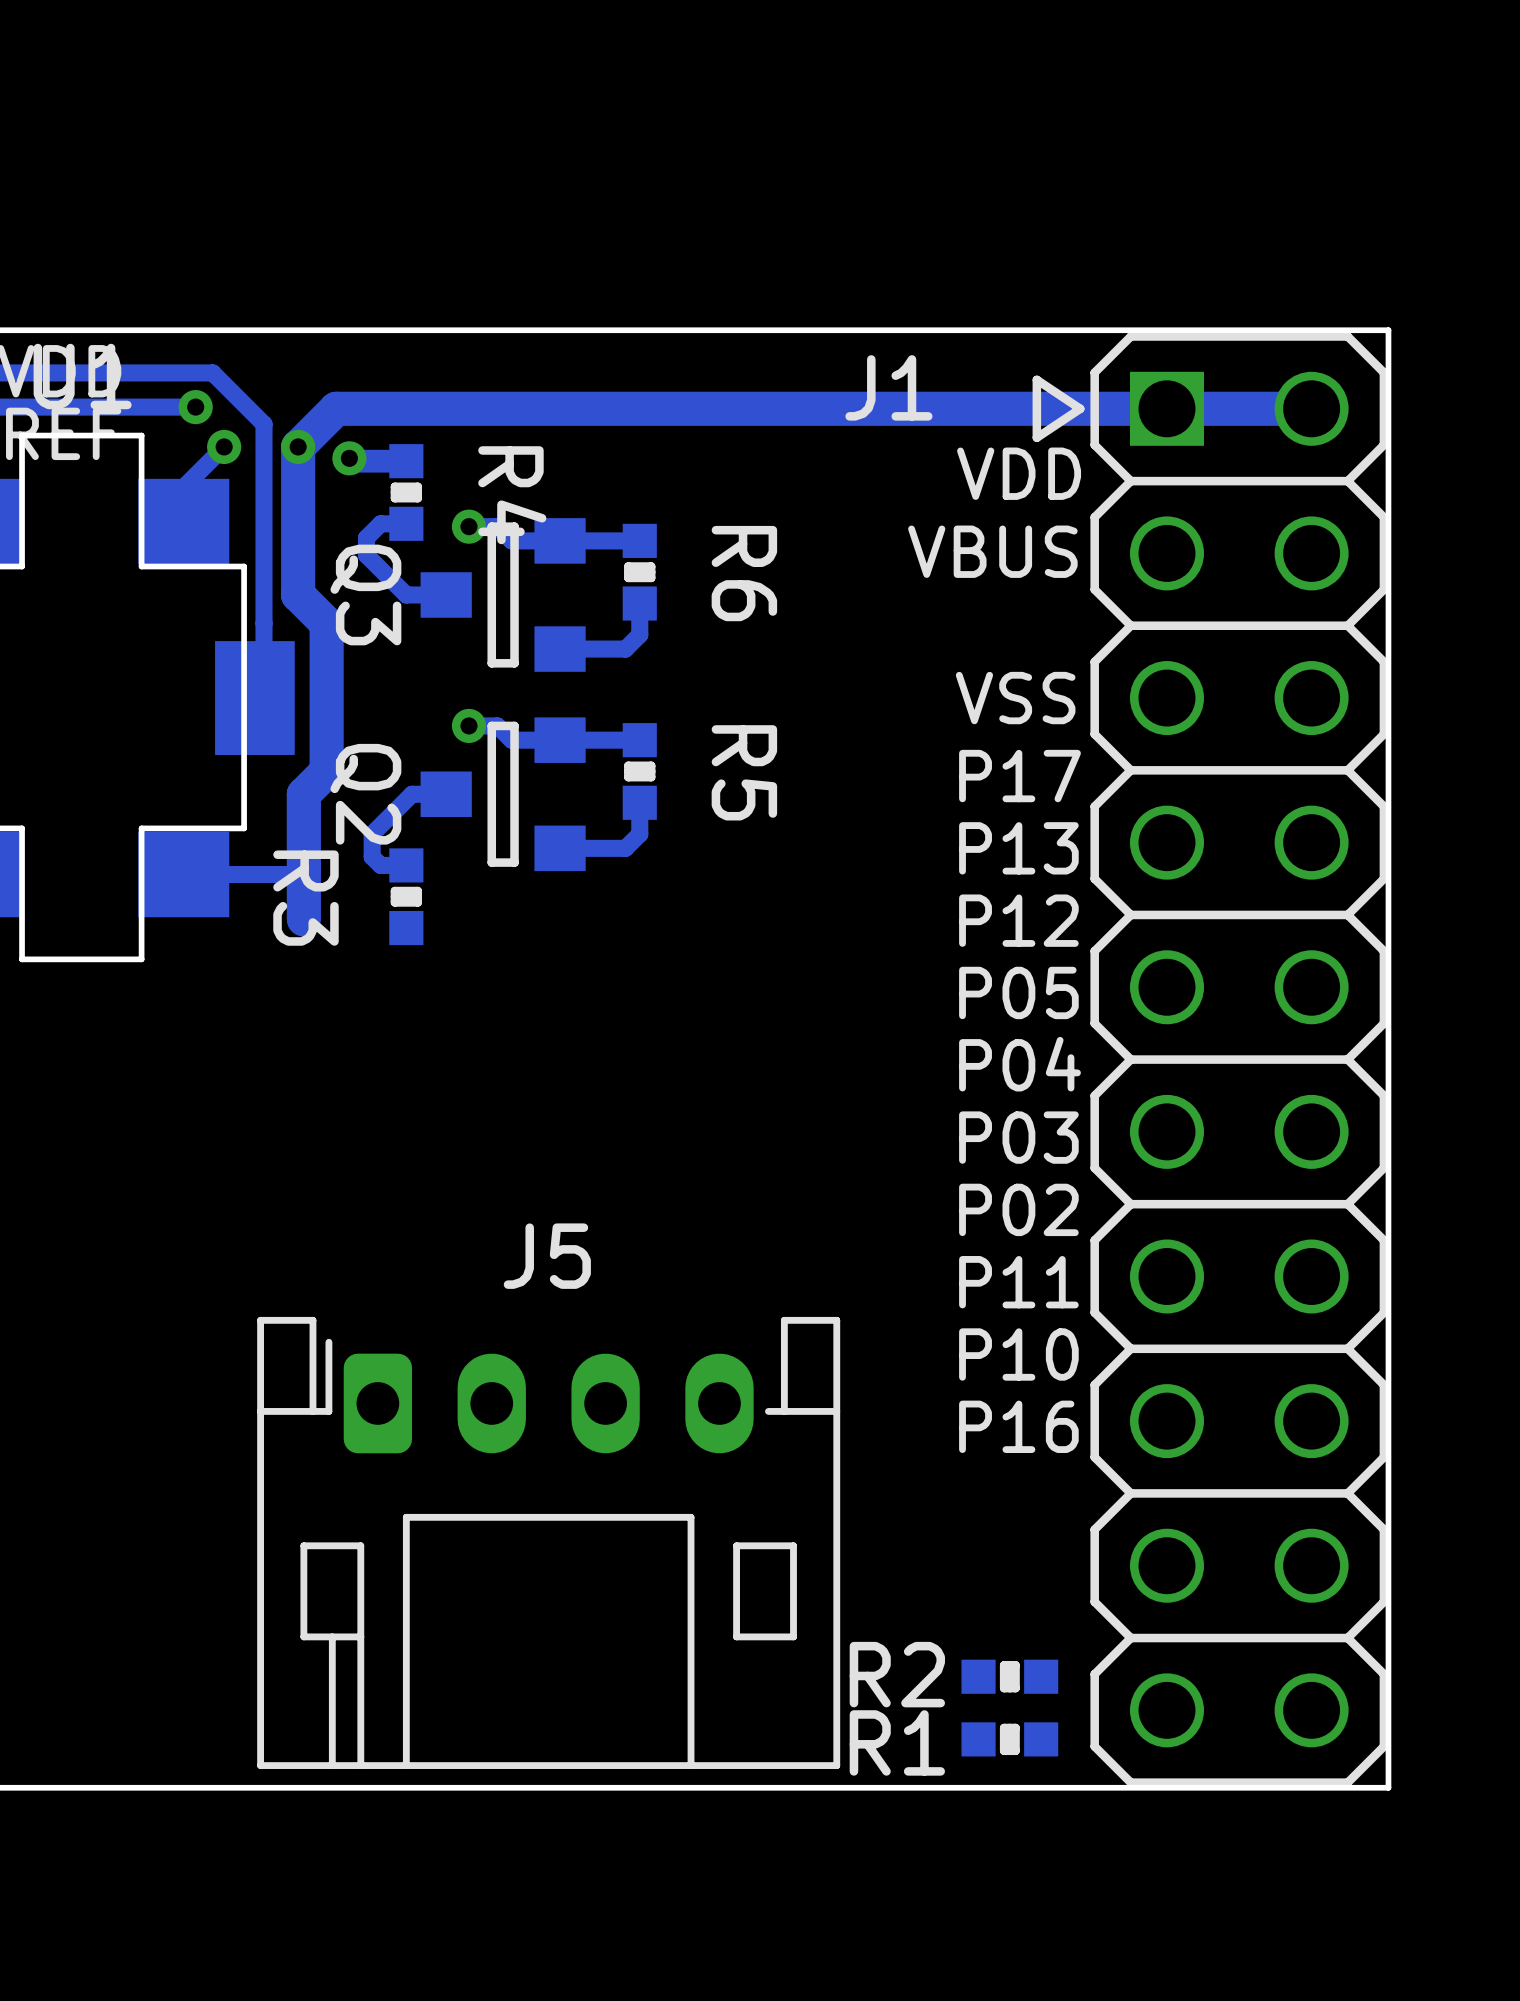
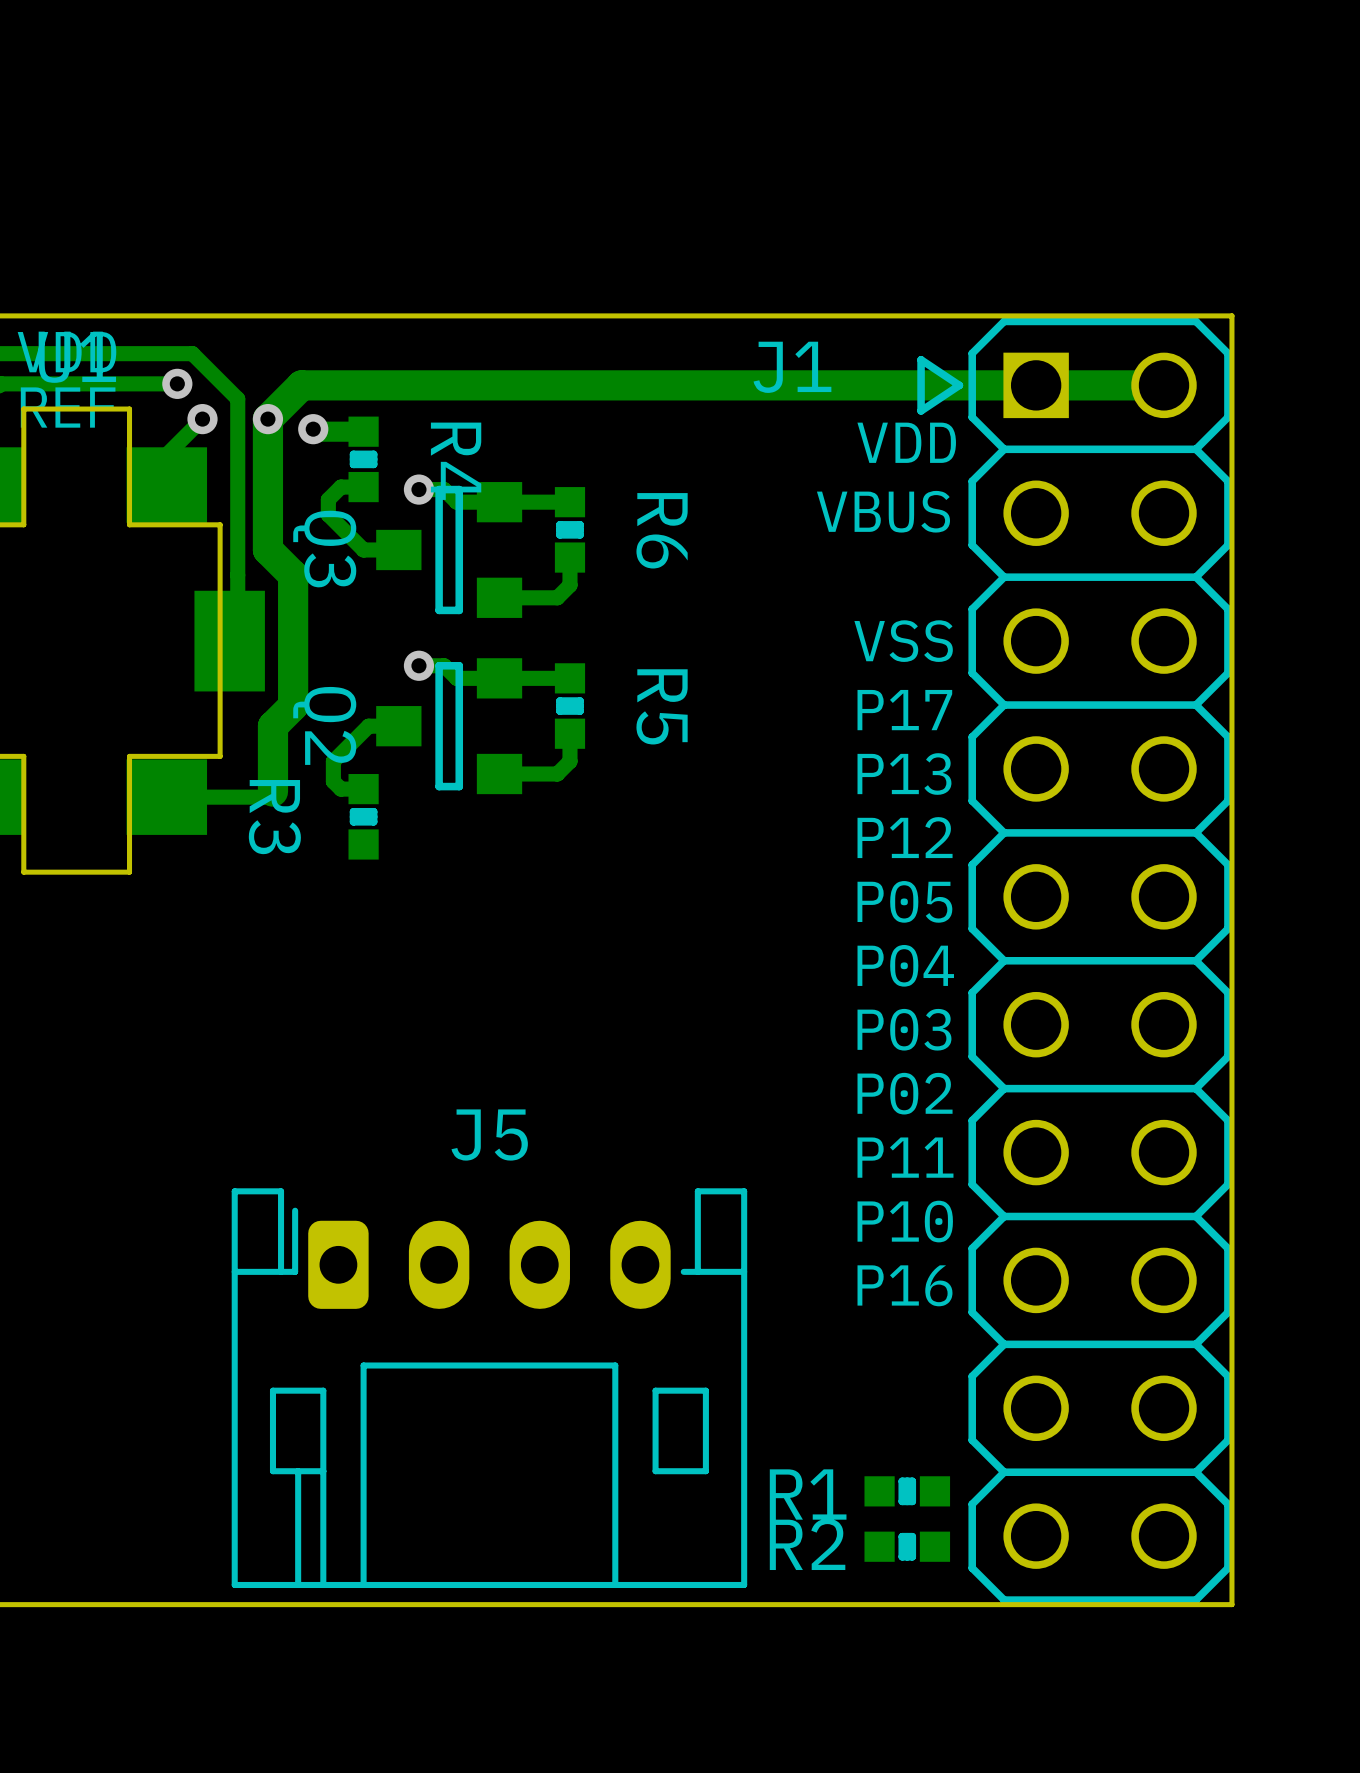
track: (303, 868) (303, 919) -> none
R2 position: (1009, 1676) -> (907, 1546)
R1 position: (1009, 1739) -> (907, 1491)

